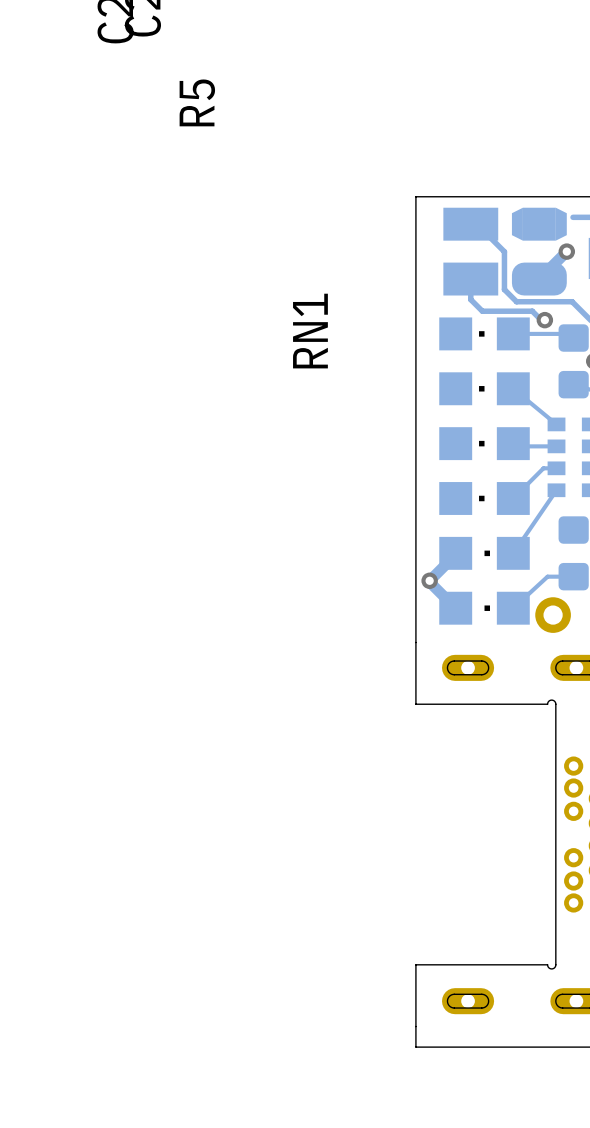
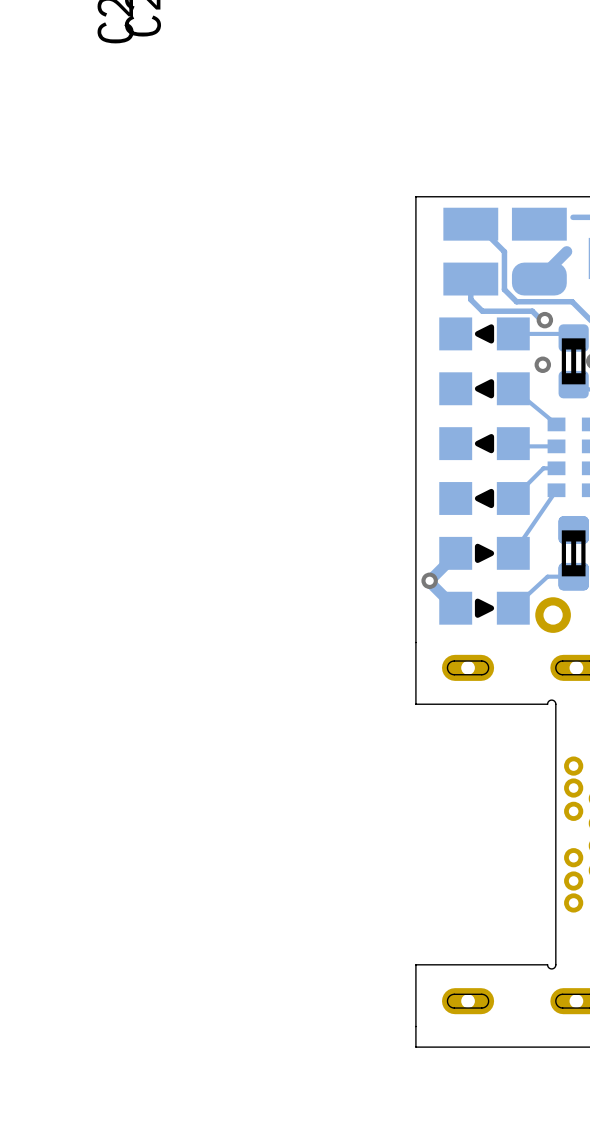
part footprint: [511, 207, 567, 241] -> [511, 207, 567, 241]
via: (566, 251) -> none
drawing: none -> [474, 324, 495, 344]
RN1 name: RN1 (310, 331) -> none
R5: (573, 361) -> none
part: none -> (573, 361)
via: none -> (542, 364)
drawing: none -> [474, 379, 495, 399]
drawing: none -> [474, 434, 495, 454]
drawing: none -> [474, 488, 495, 509]
drawing: none -> [474, 543, 495, 563]
part: none -> (573, 553)
drawing: none -> [474, 598, 495, 618]

